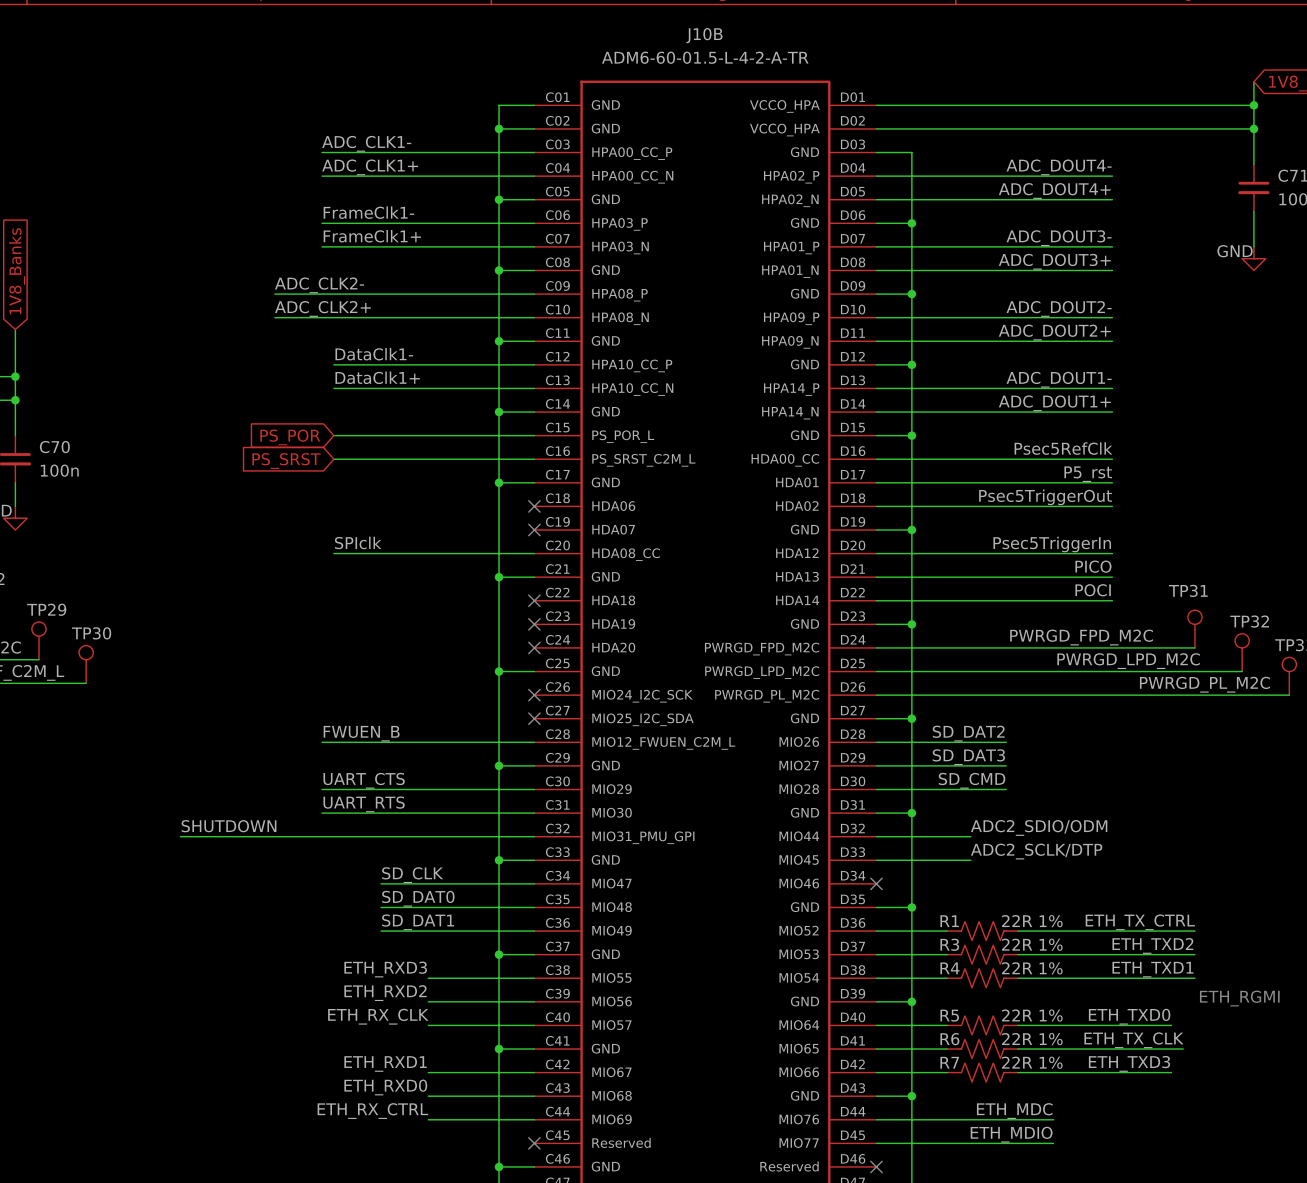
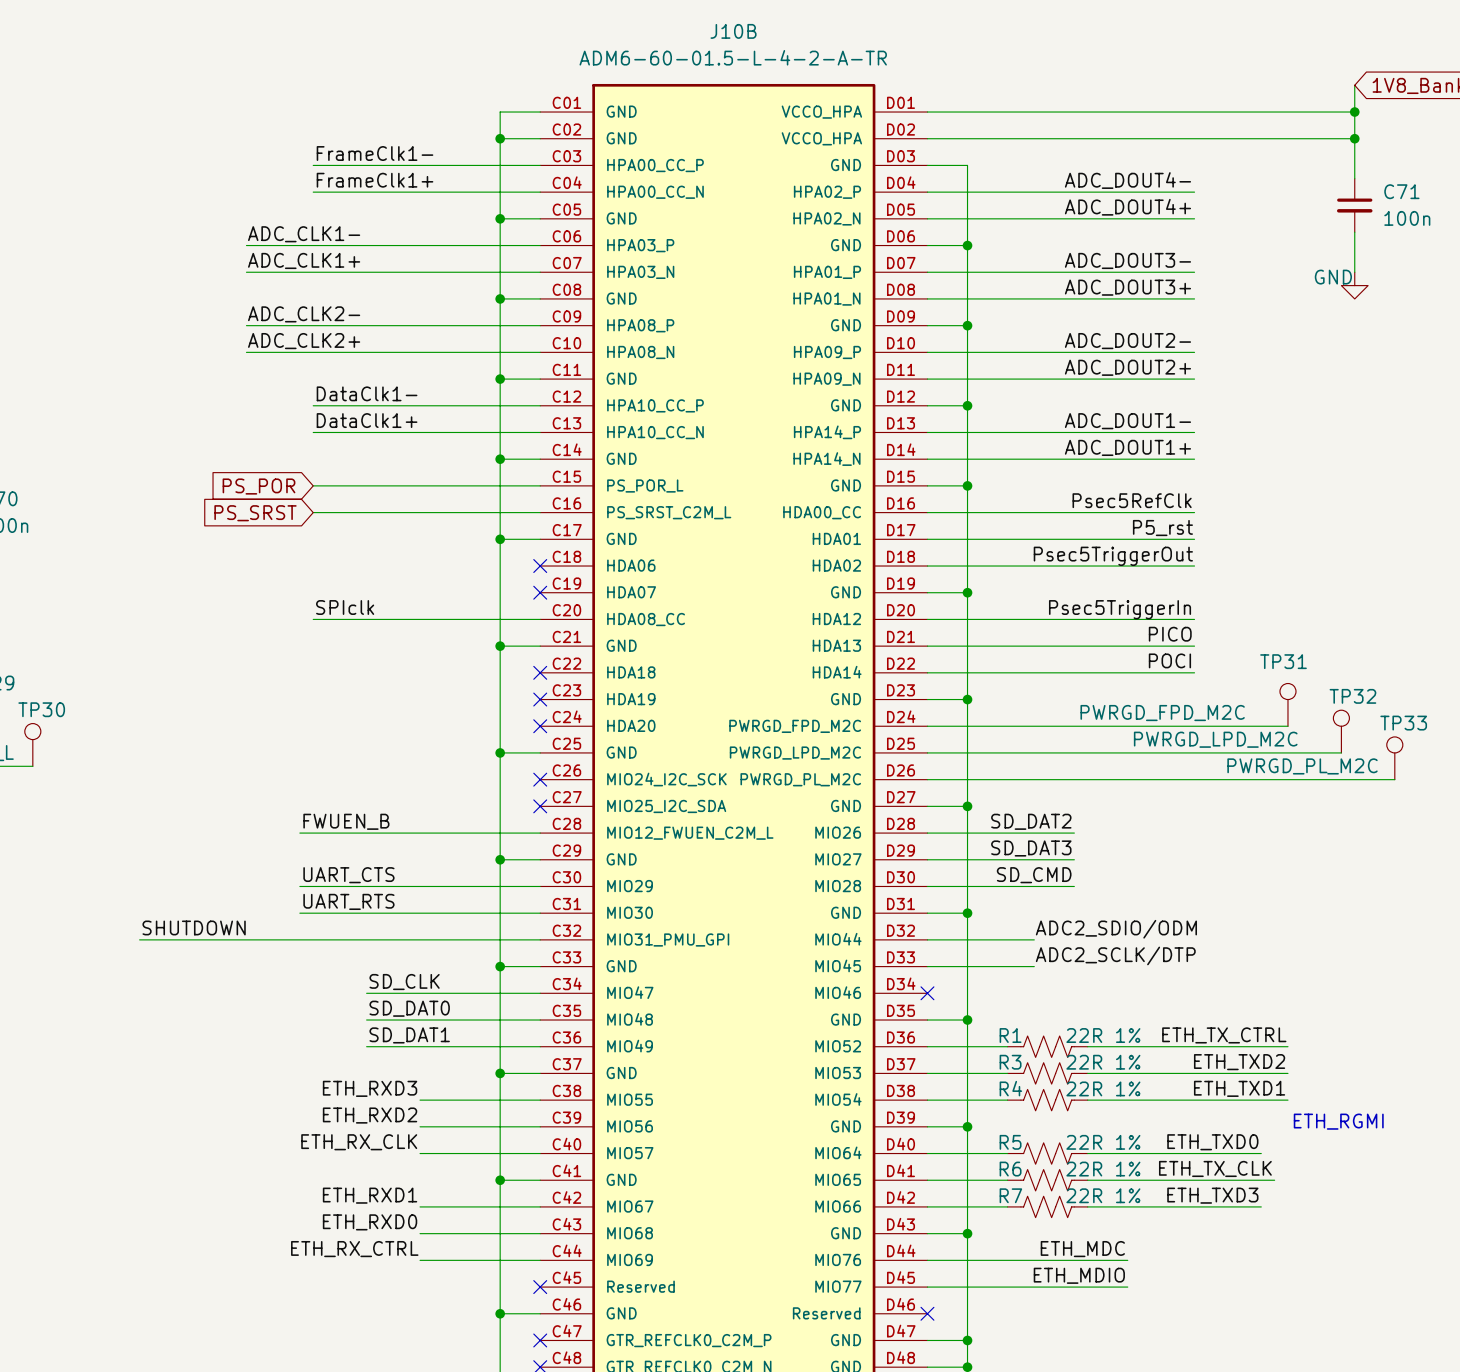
label position: ADC_CLK1- (366, 143) -> ADC_CLK1- (304, 234)
wire: (322, 152) (333, 152) -> none
label position: ADC_CLK1+ (370, 167) -> ADC_CLK1+ (304, 260)
wire: (322, 176) (333, 176) -> none
label position: FrameClk1- (368, 212) -> FrameClk1- (375, 153)
wire: none -> (246, 245) (299, 245)
label position: FrameClk1+ (372, 236) -> FrameClk1+ (375, 180)
wire: none -> (246, 272) (299, 272)

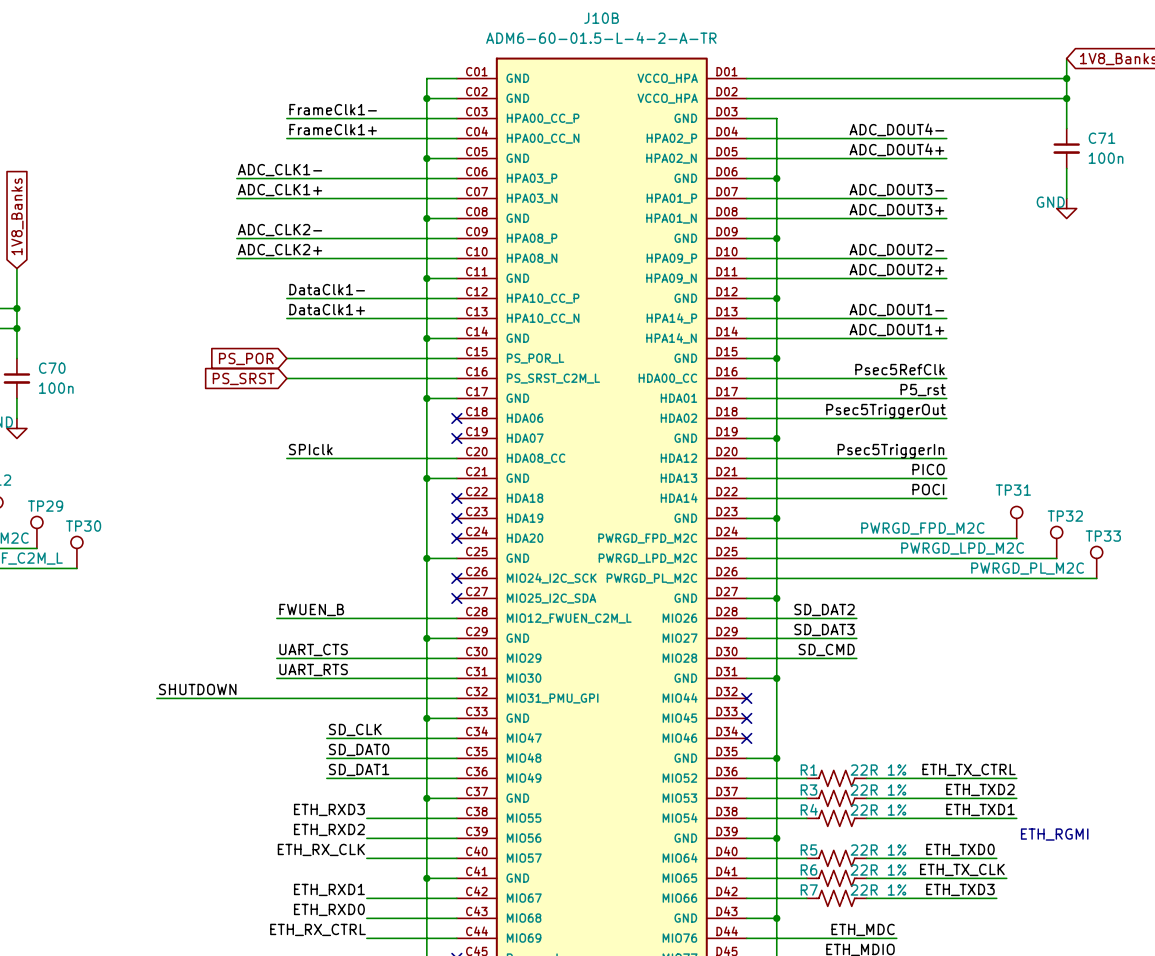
label: ADC2_SDIO/ODM (1116, 929) -> none
wire: (927, 939) (1034, 939) -> none
no-connect mark: none -> (746, 698)
label: ADC2_SCLK/DTP (1115, 955) -> none
wire: (927, 966) (1034, 966) -> none
no-connect mark: none -> (746, 718)

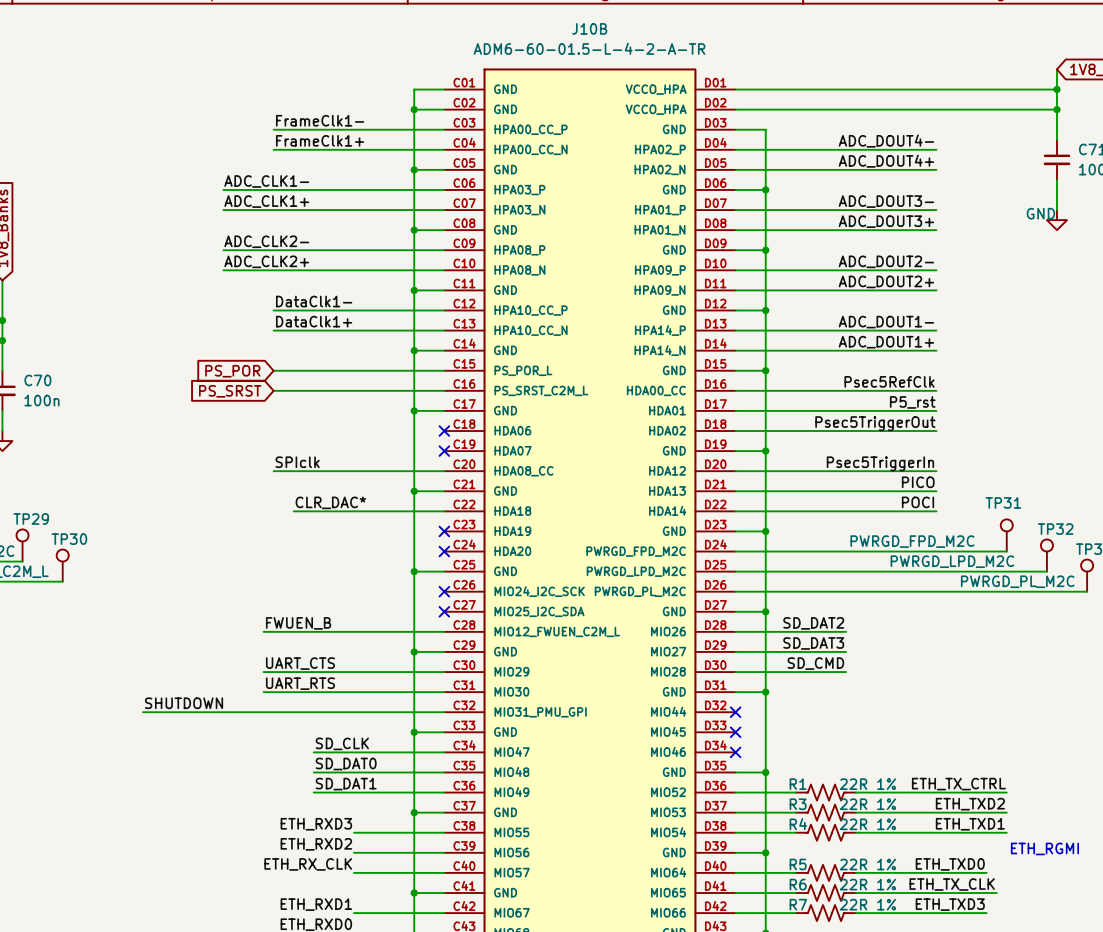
label: none -> CLR_DAC* (330, 502)
wire: none -> (293, 511) (444, 511)
no-connect mark: (456, 498) -> none

